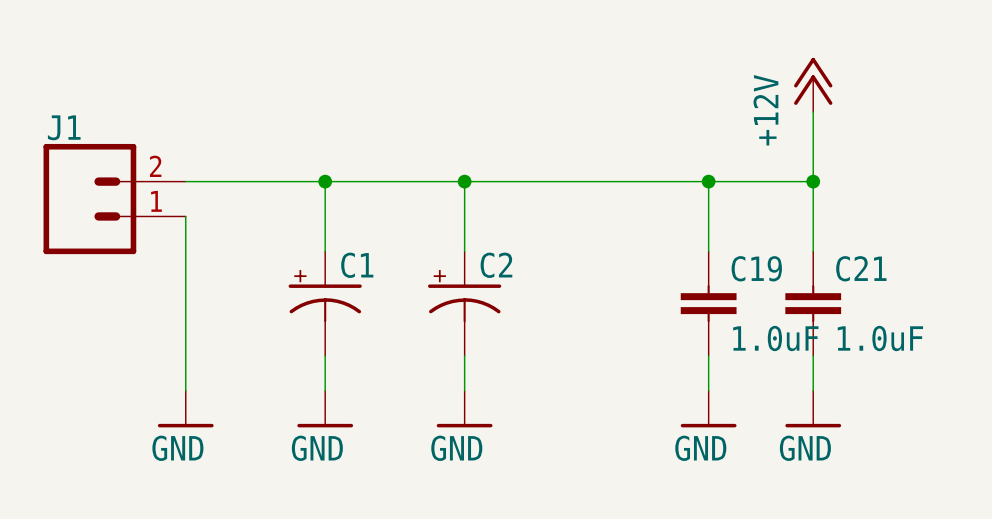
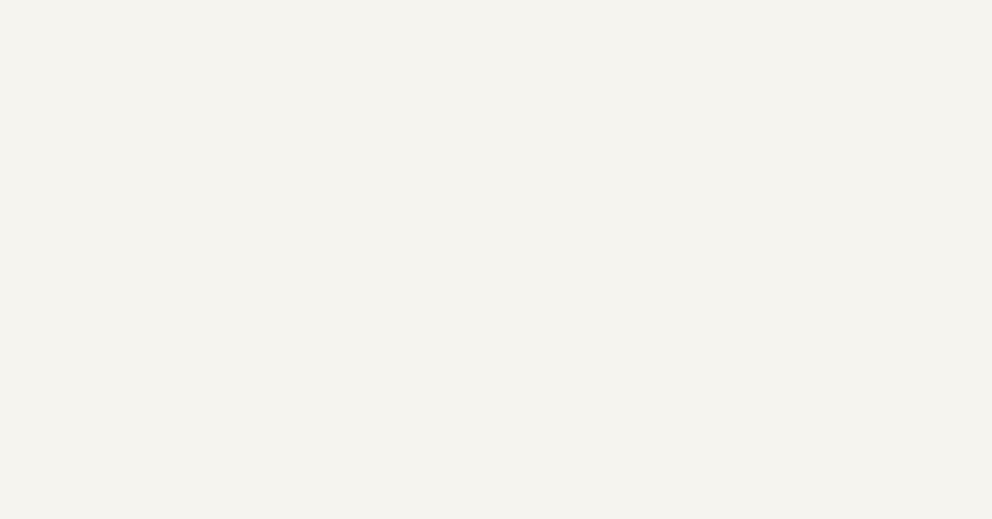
power symbol: +12V (813, 84) -> none
wire: (813, 111) (813, 251) -> none
wire: (185, 181) (813, 181) -> none
wire: (325, 181) (325, 251) -> none
junction: (325, 181) -> none
wire: (464, 181) (464, 251) -> none
junction: (464, 181) -> none
wire: (708, 181) (708, 251) -> none
junction: (708, 181) -> none
junction: (813, 181) -> none
J1: (114, 199) -> none
wire: (185, 216) (185, 390) -> none
C1: (325, 303) -> none
C2: (464, 303) -> none
C19: 1.0uF (708, 303) -> none
C21: 1.0uF (813, 303) -> none
wire: (325, 355) (325, 390) -> none
wire: (464, 355) (464, 390) -> none
wire: (708, 355) (708, 390) -> none
wire: (813, 355) (813, 390) -> none
power symbol: GND (185, 409) -> none
power symbol: GND (325, 409) -> none
power symbol: GND (464, 409) -> none
power symbol: GND (708, 409) -> none
power symbol: GND (813, 409) -> none

